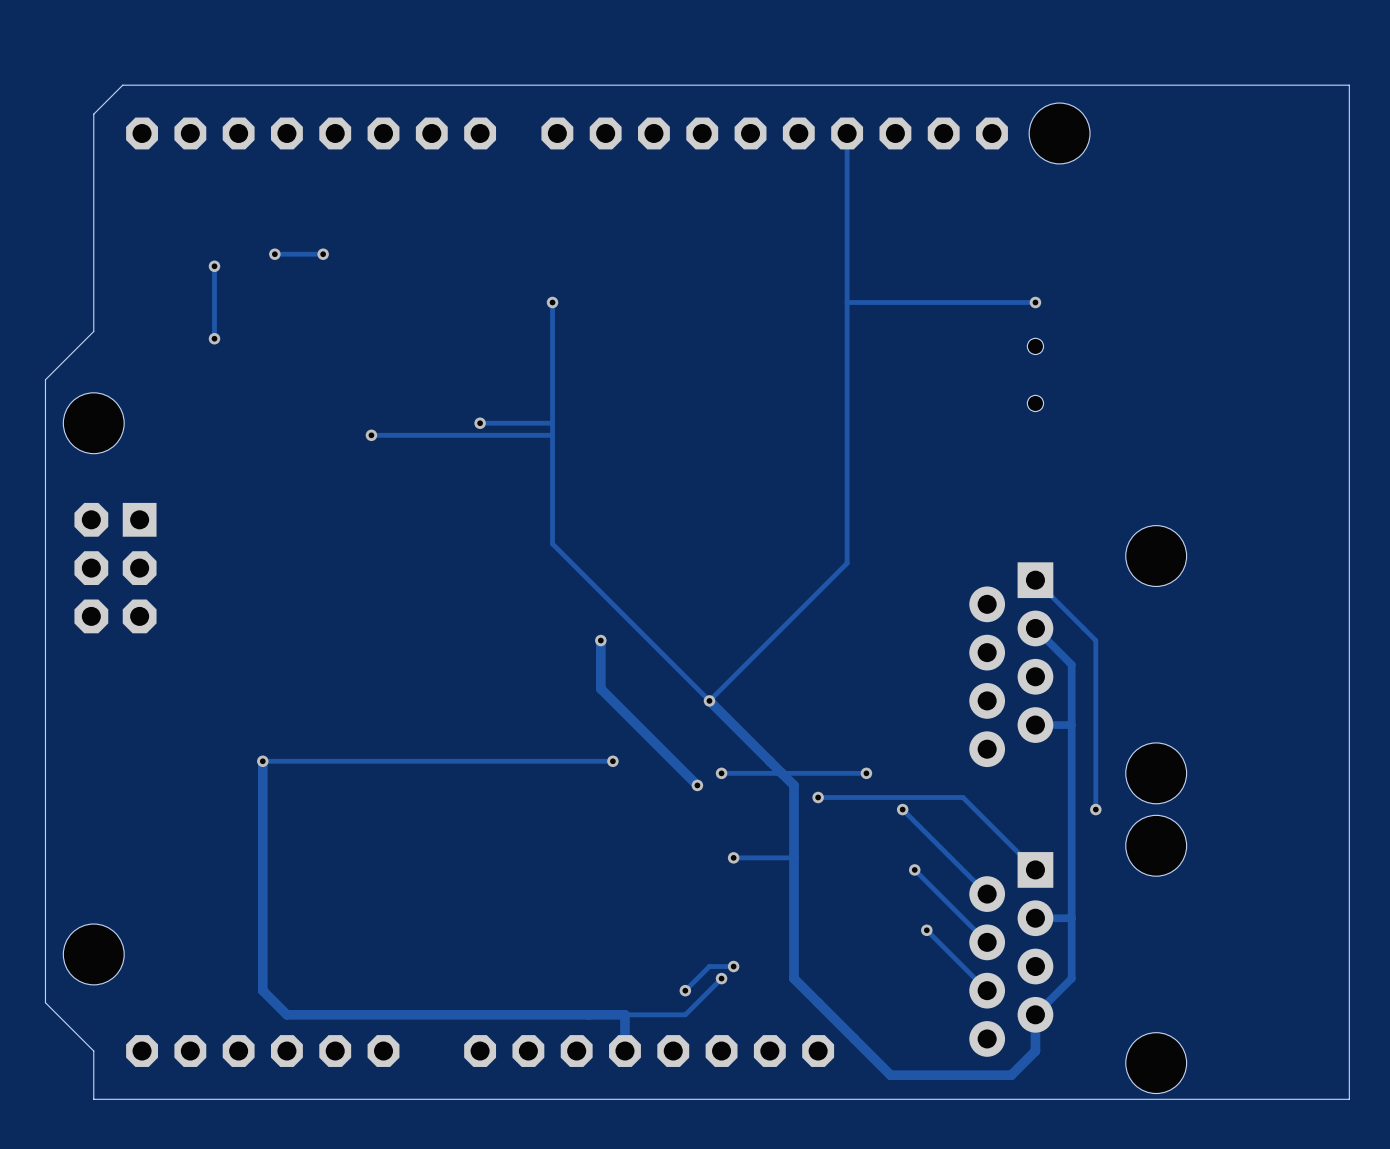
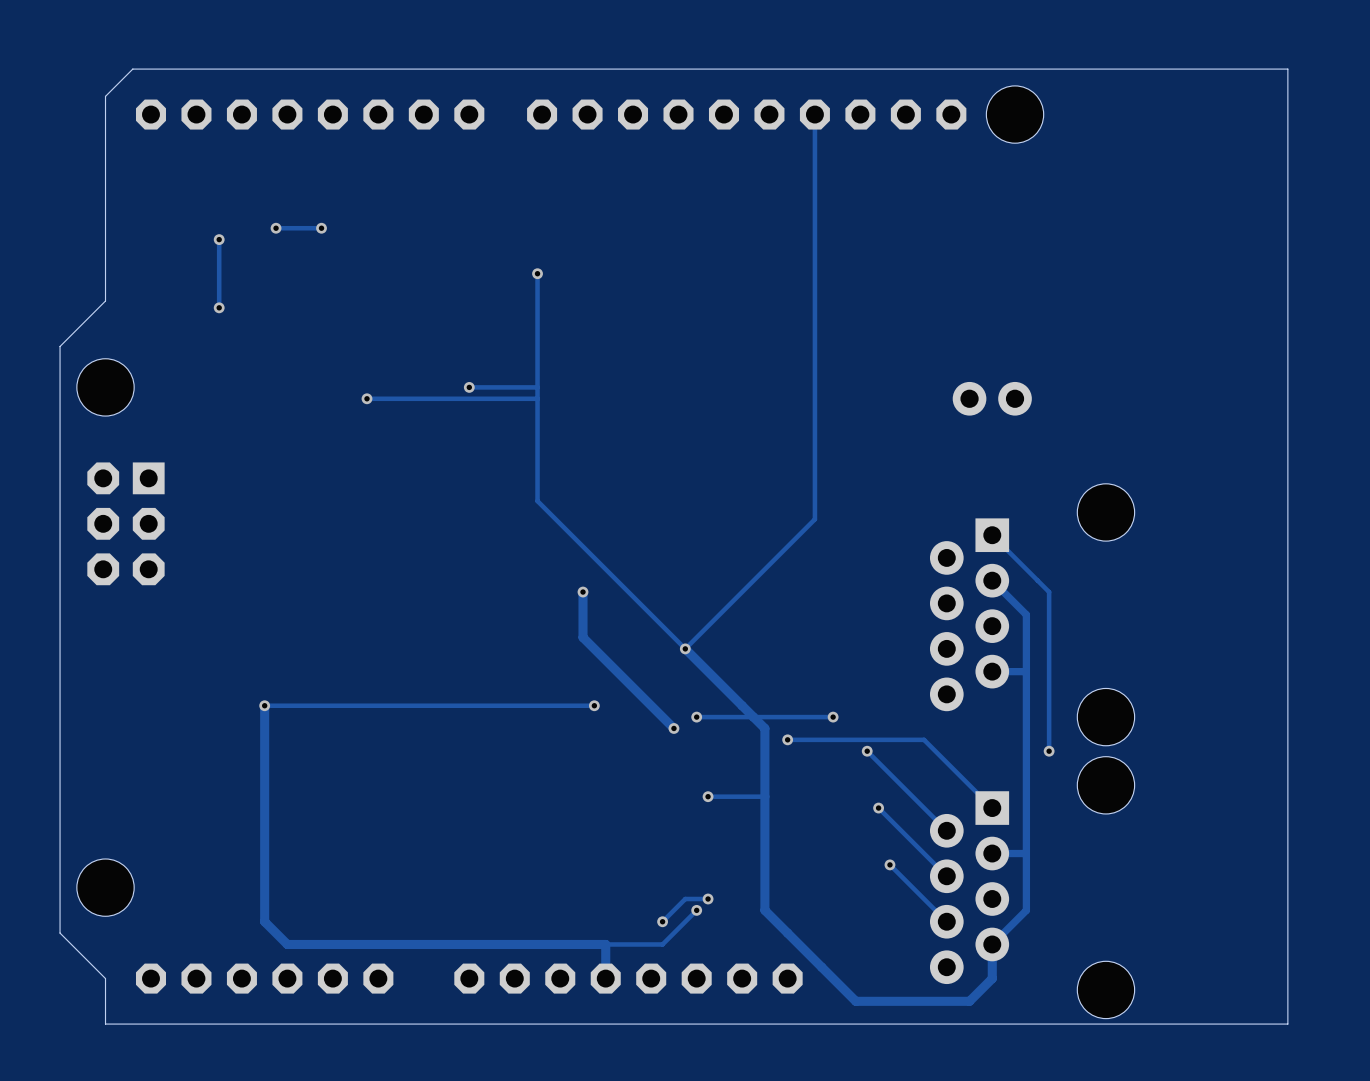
track: (1035, 302) (847, 302) -> none
via: (1035, 302) -> none
part: (1035, 374) -> none
part: none -> (992, 398)

